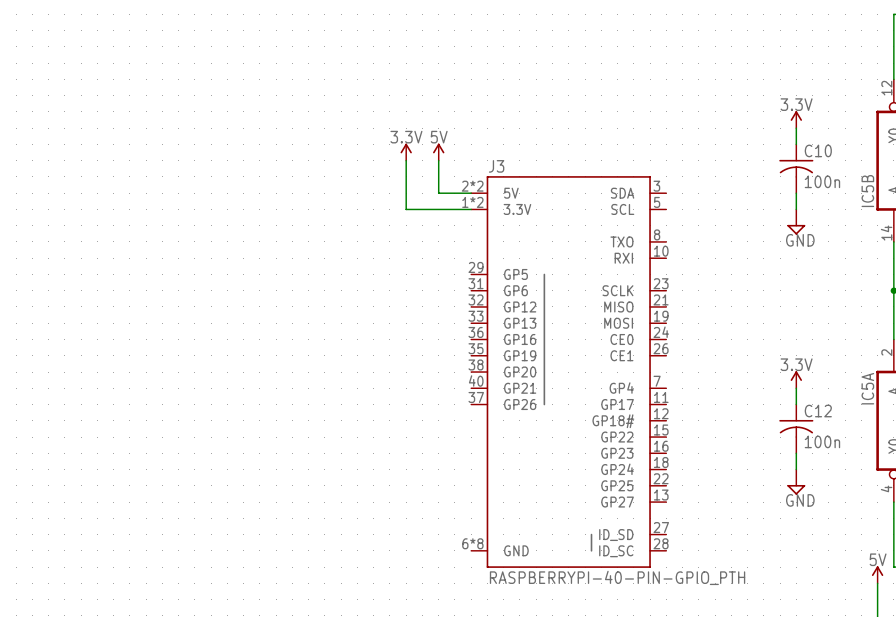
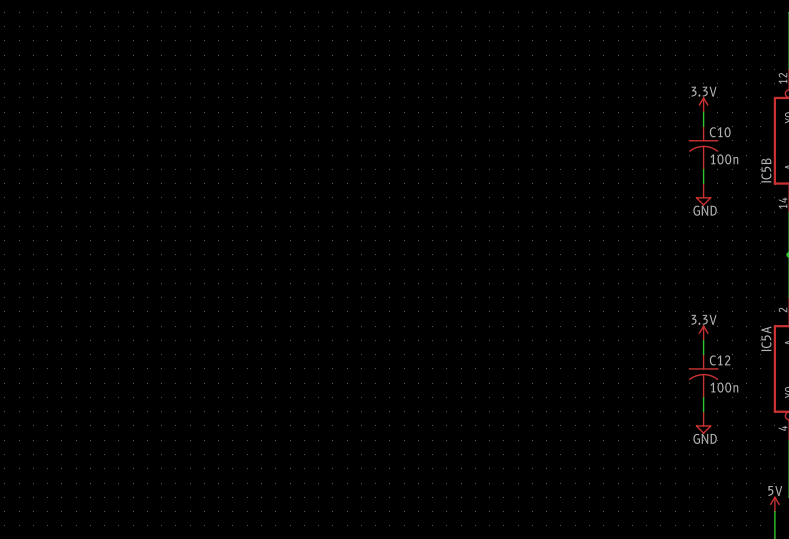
power symbol: 3.3V (406, 152) -> none
power symbol: 5V (438, 152) -> none
wire: (406, 160) (406, 209) (471, 209) -> none
wire: (438, 160) (438, 193) (471, 193) -> none
J3: RASPBERRYPI-40-PIN-GPIO_PTH (568, 372) -> none

